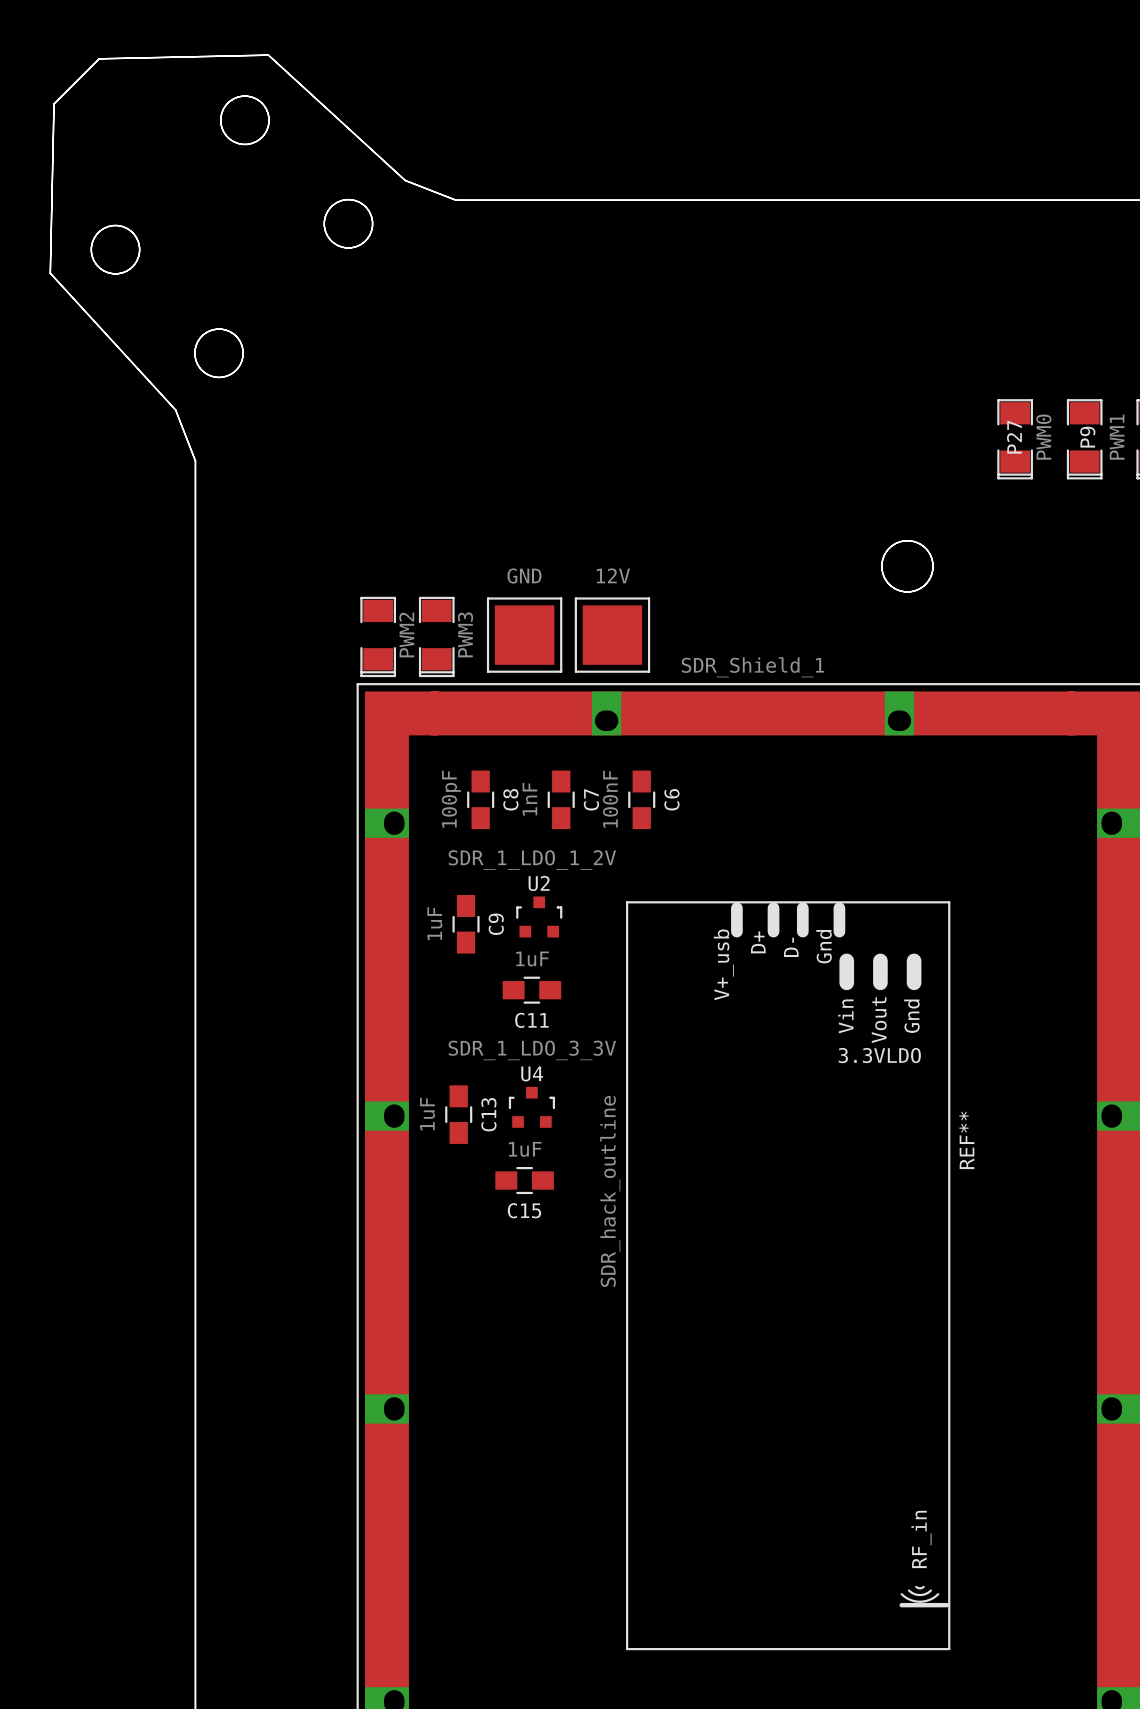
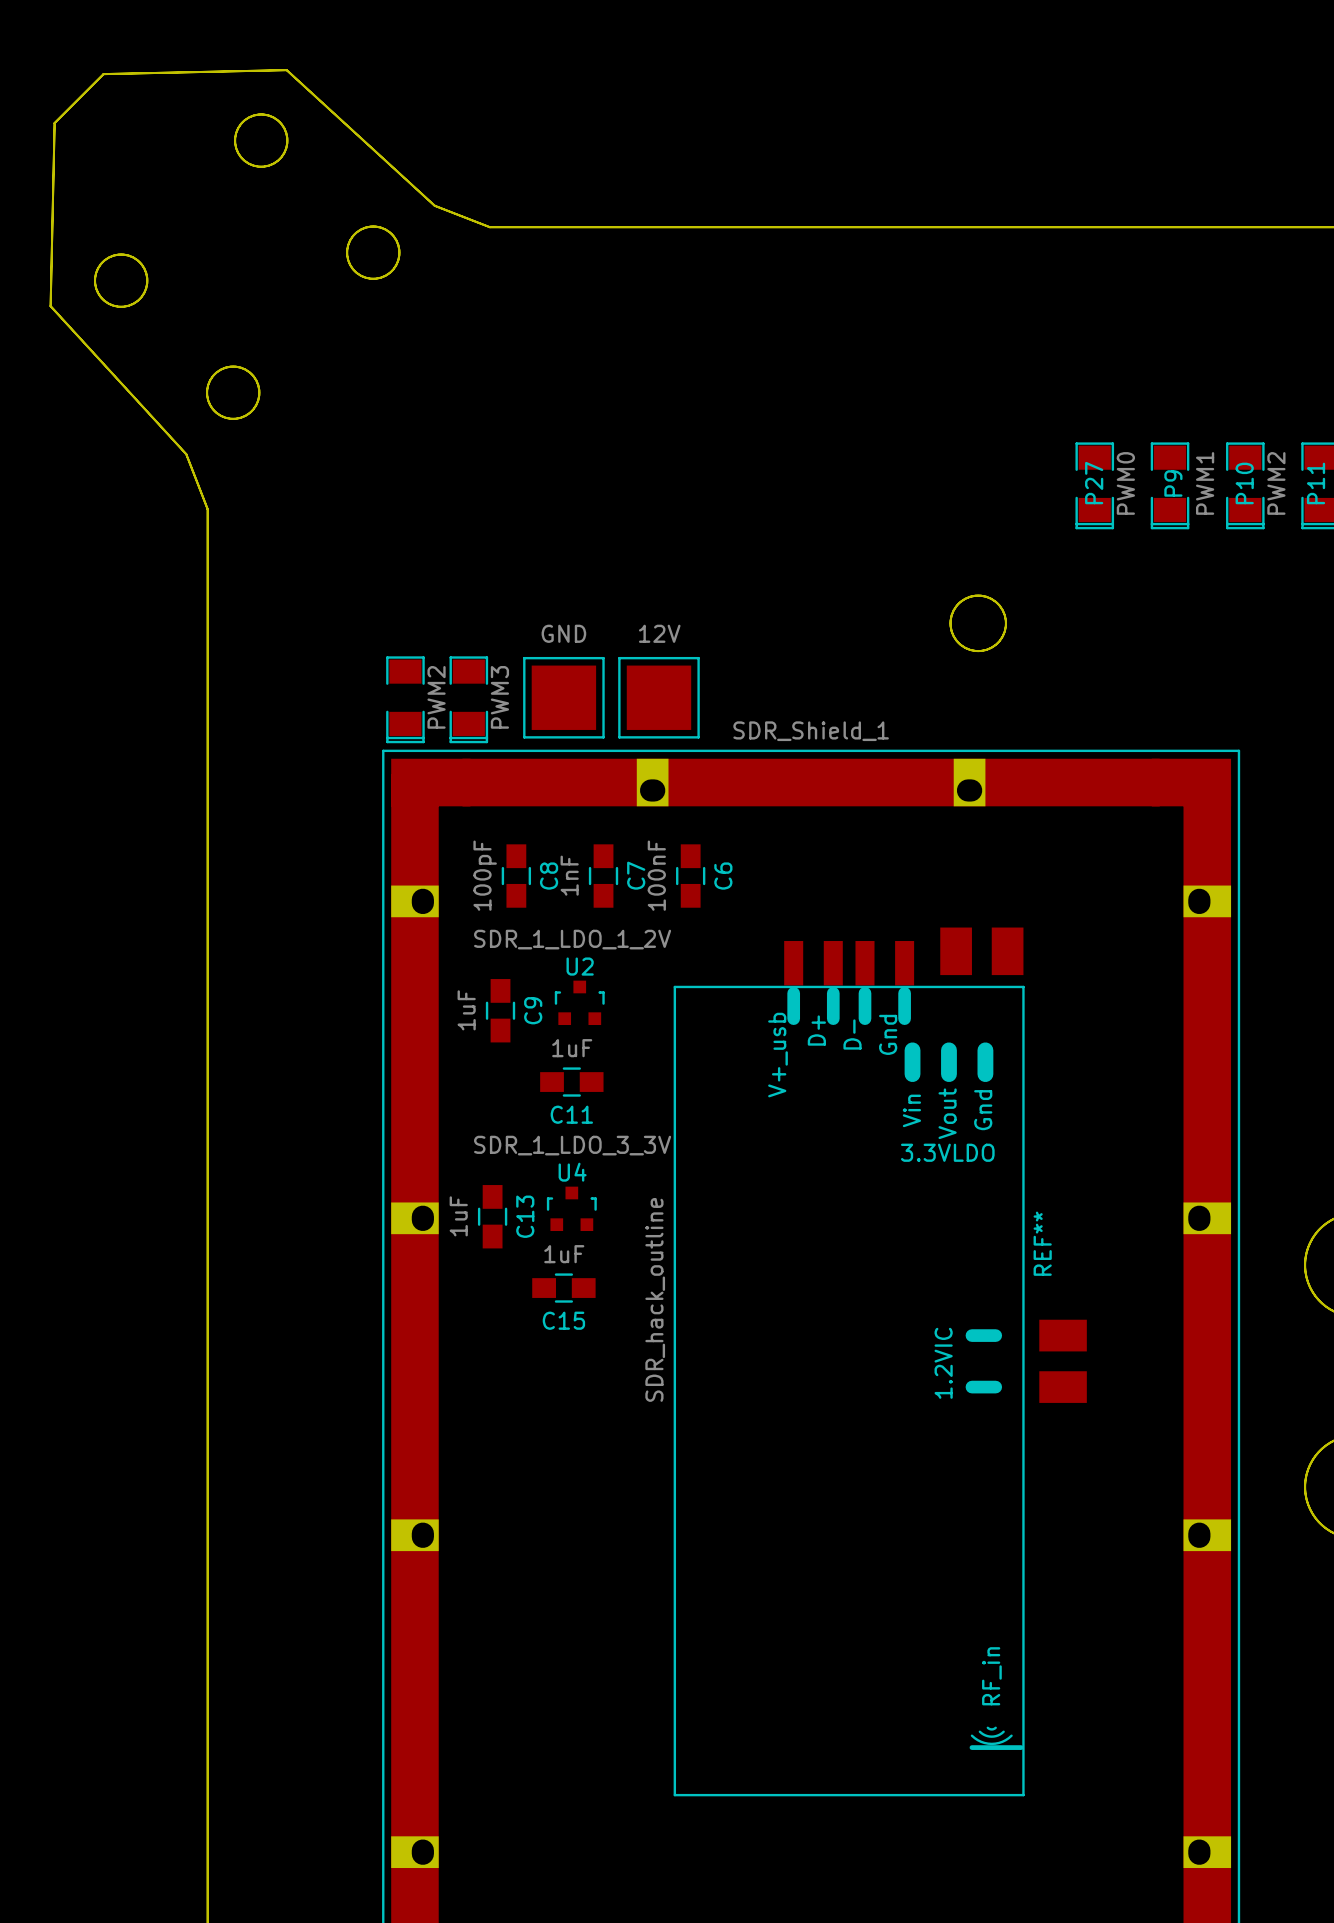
REF**: none -> SDR_hack_outline (880, 1361)
REF**: SDR_hack_outline (788, 1275) -> none

